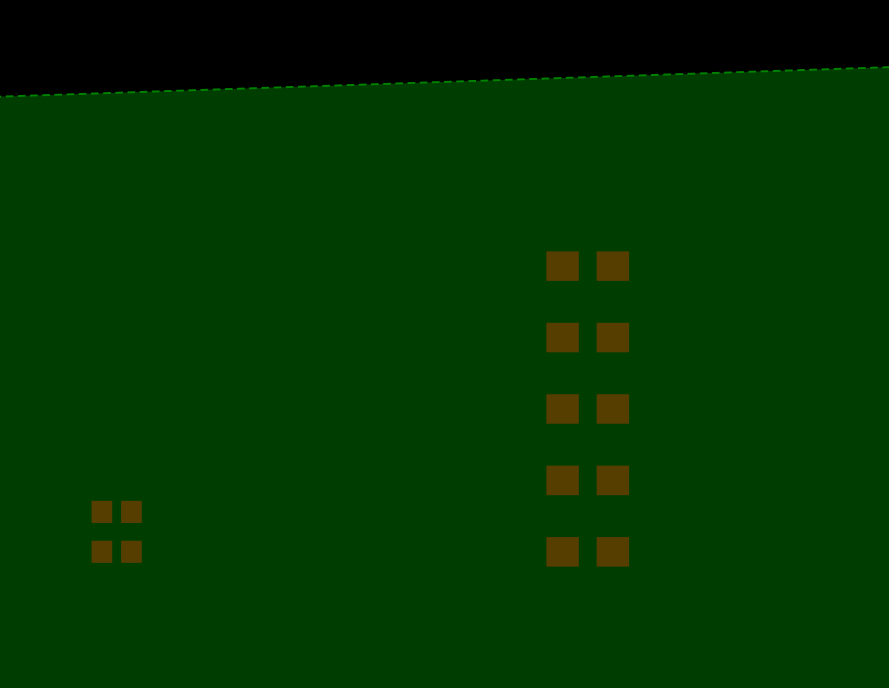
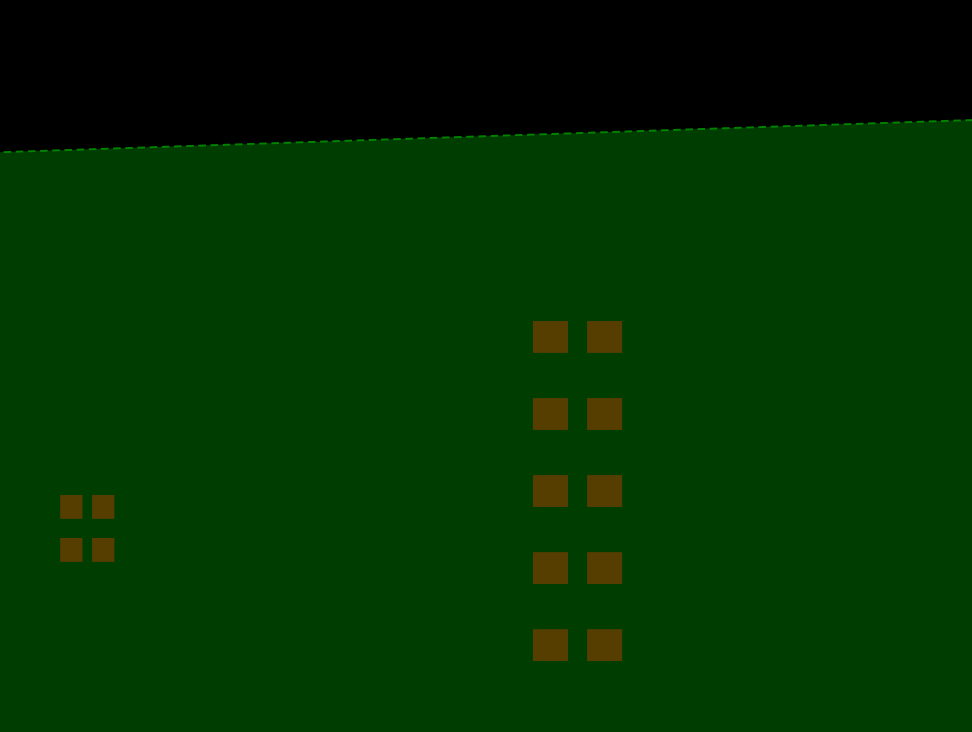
part position: (116, 531) -> (87, 528)

